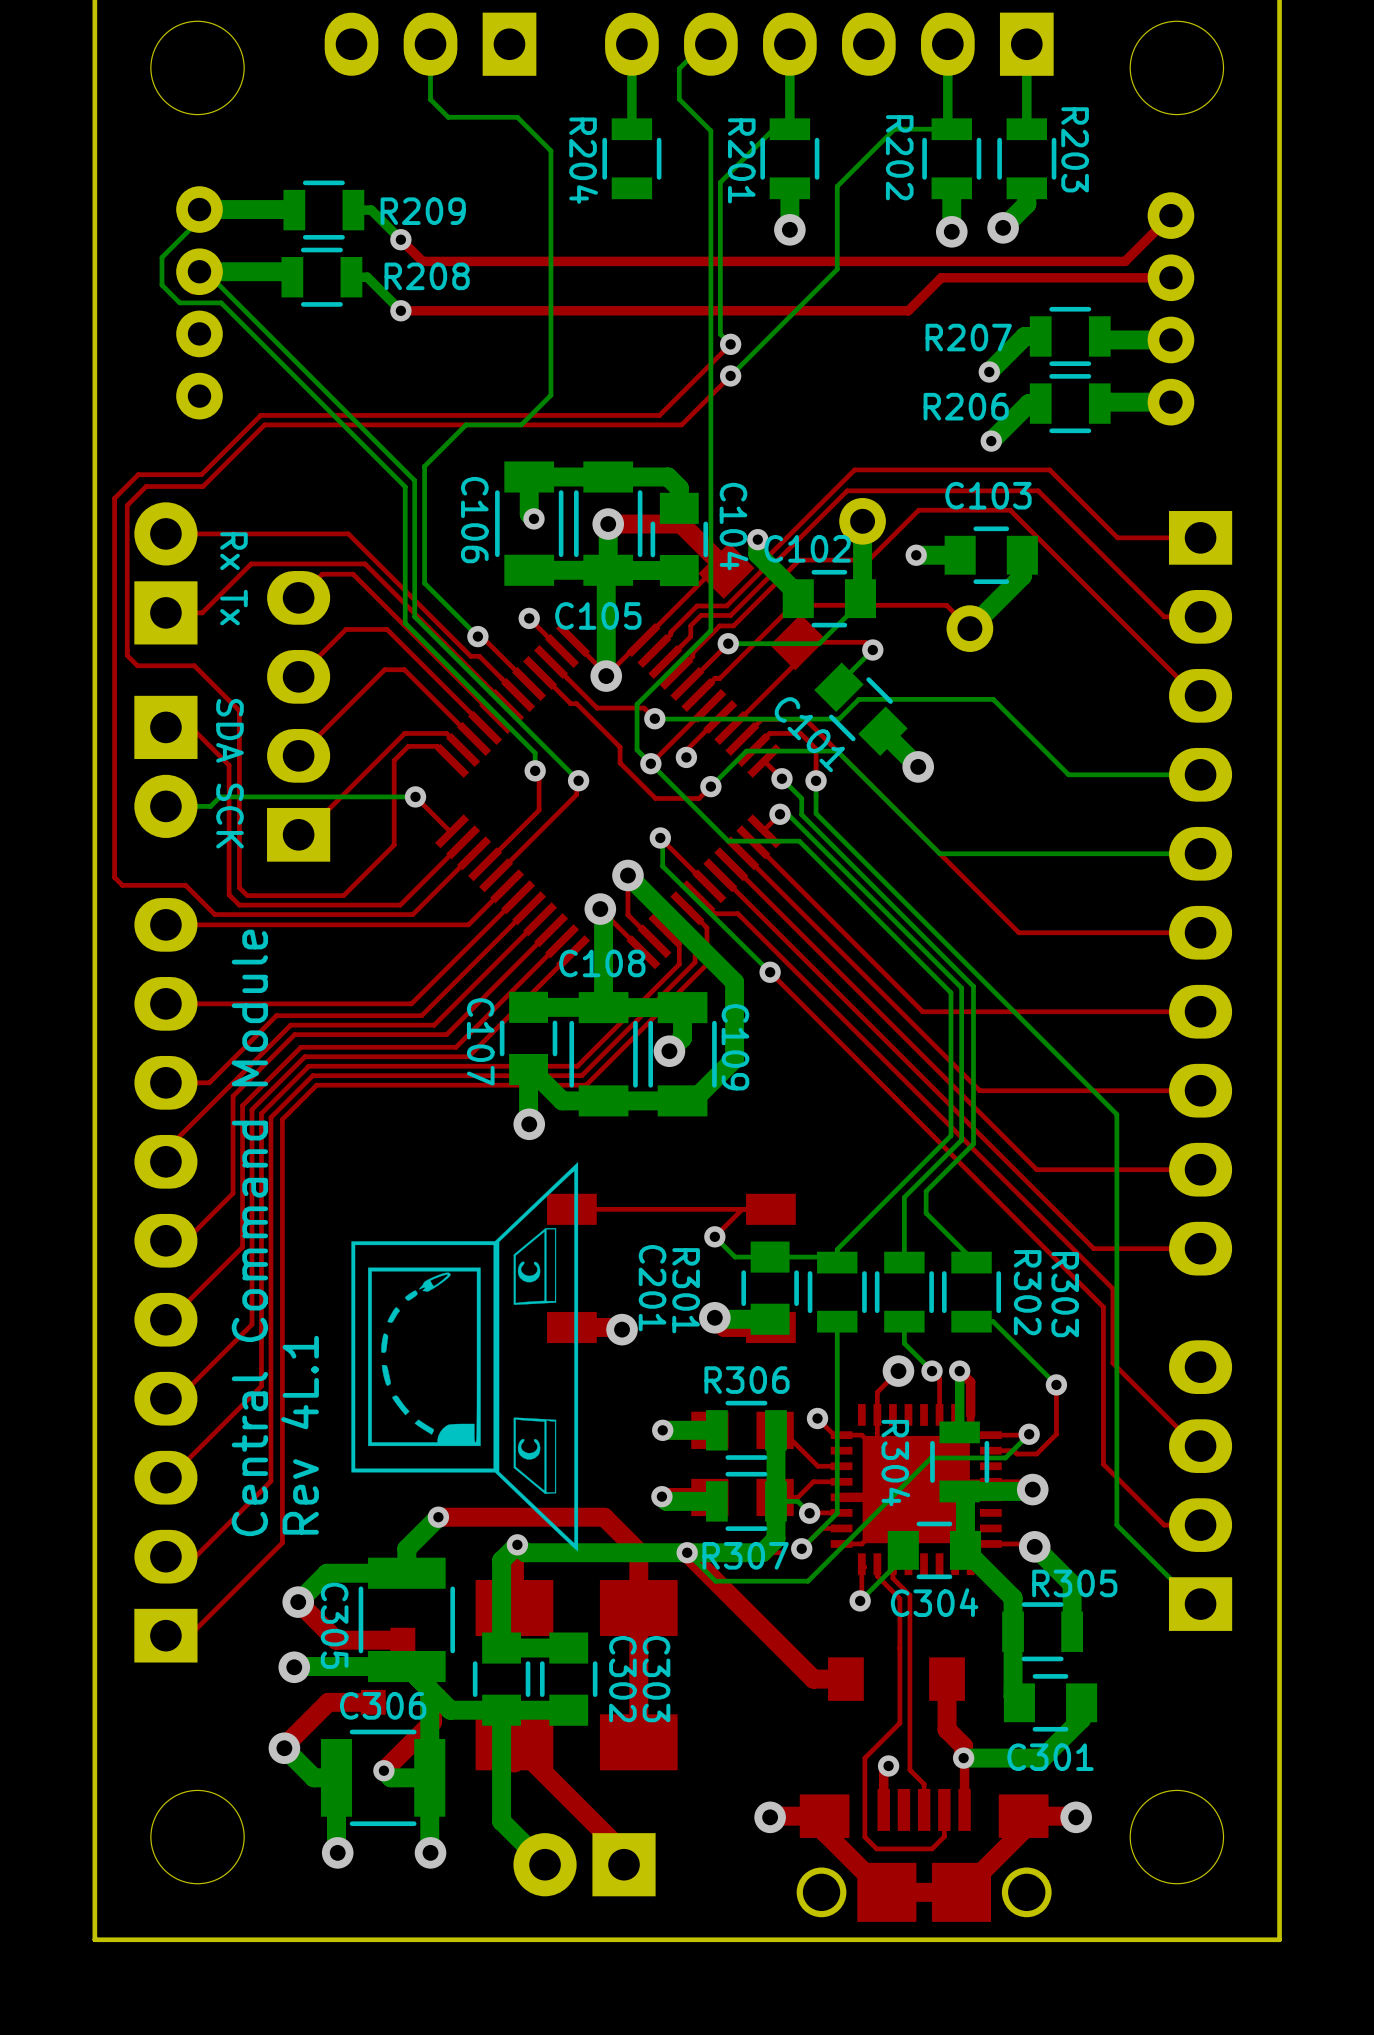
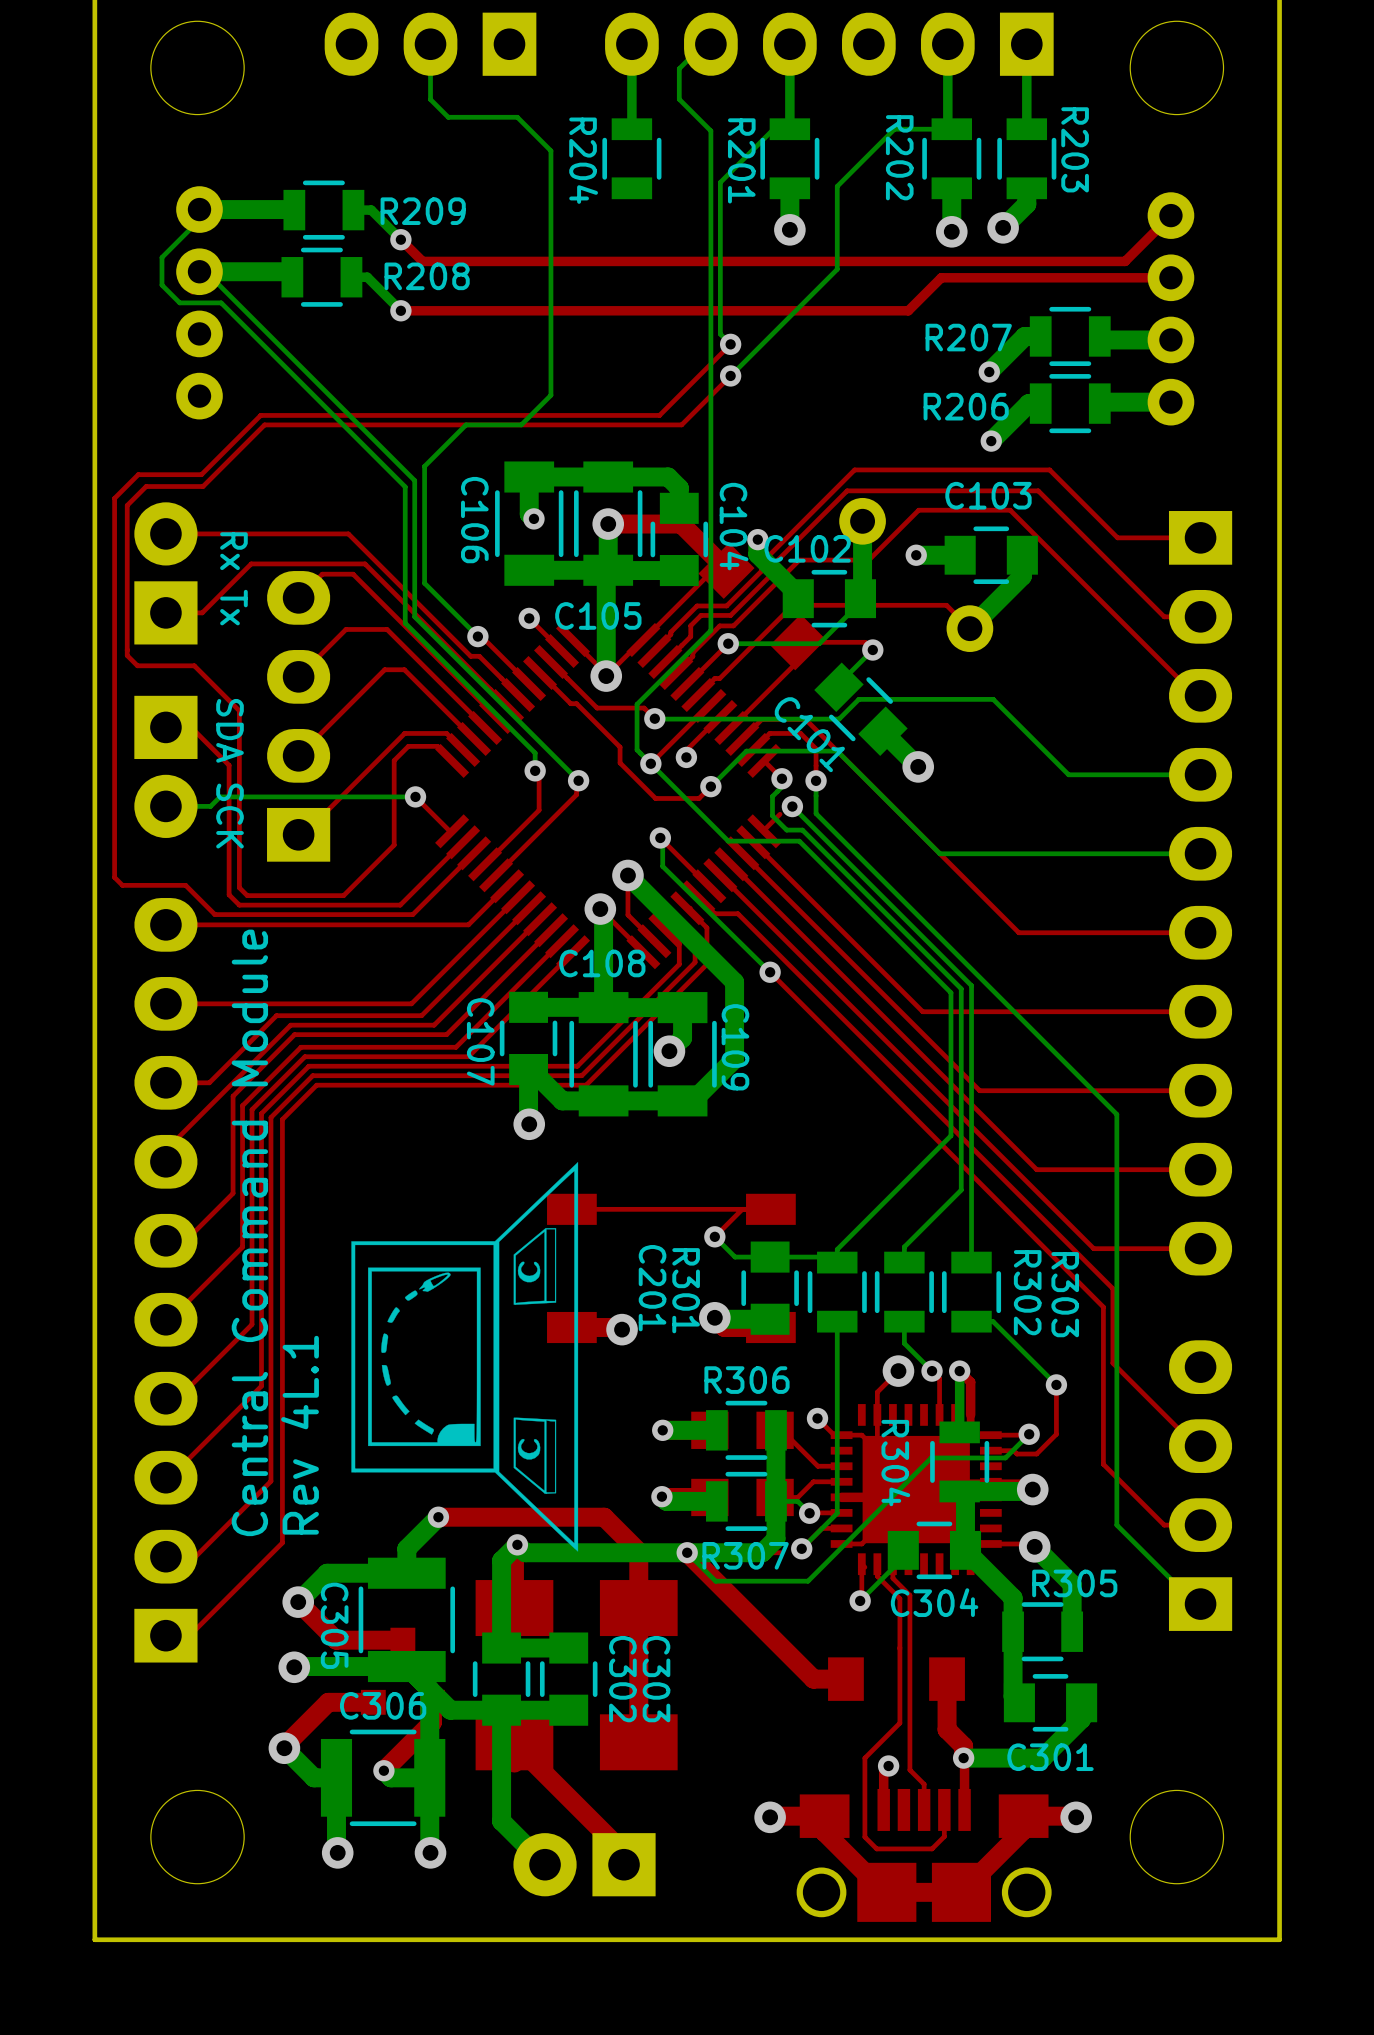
bottom track: (781, 778) (801, 798) (801, 814) (973, 986) (973, 1144) (926, 1191) (926, 1213) (971, 1258) -> (792, 806) (971, 985) (971, 1258)
bottom track: (780, 814) (787, 814) (961, 988) (961, 1140) (904, 1197) (904, 1262) -> (788, 780) (772, 796) (772, 815) (786, 830) (802, 830) (961, 988) (961, 1190) (904, 1246) (904, 1262)
via position: (780, 814) -> (792, 806)

